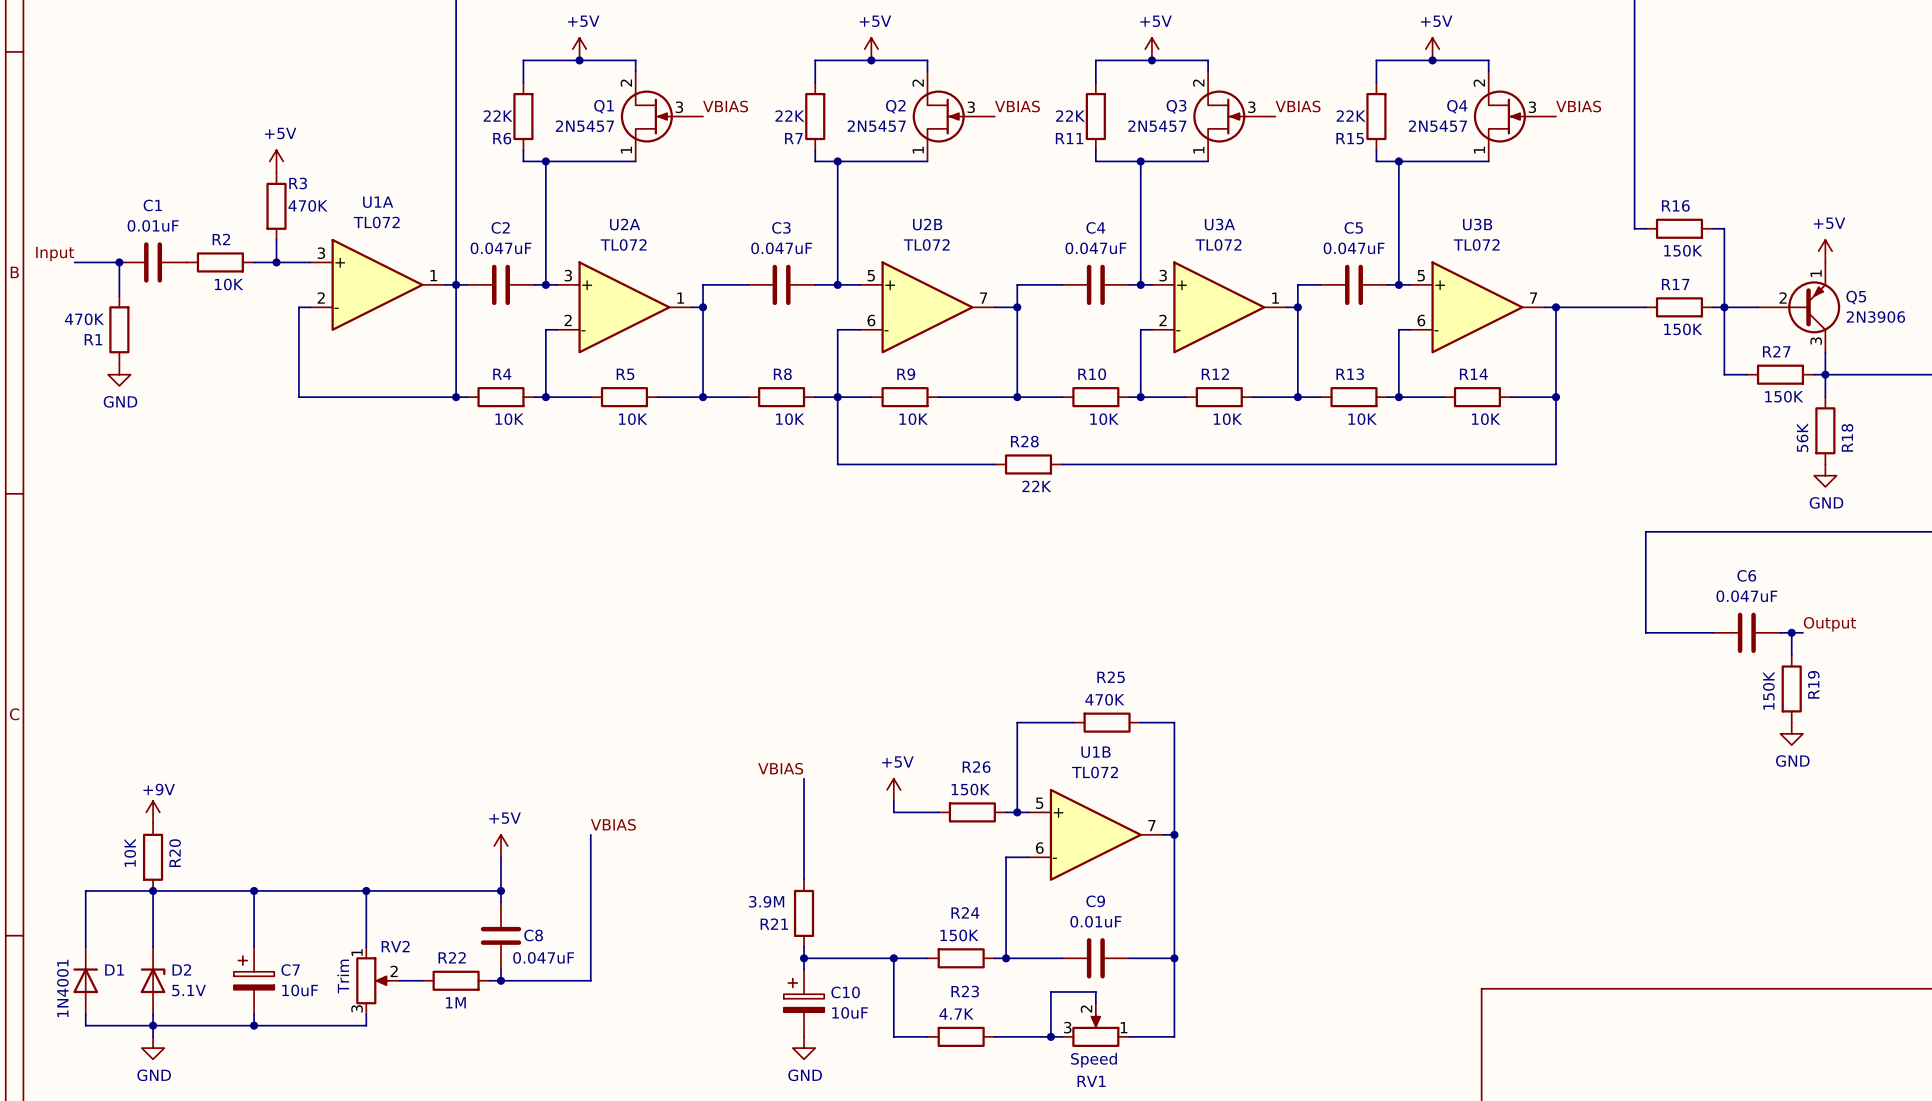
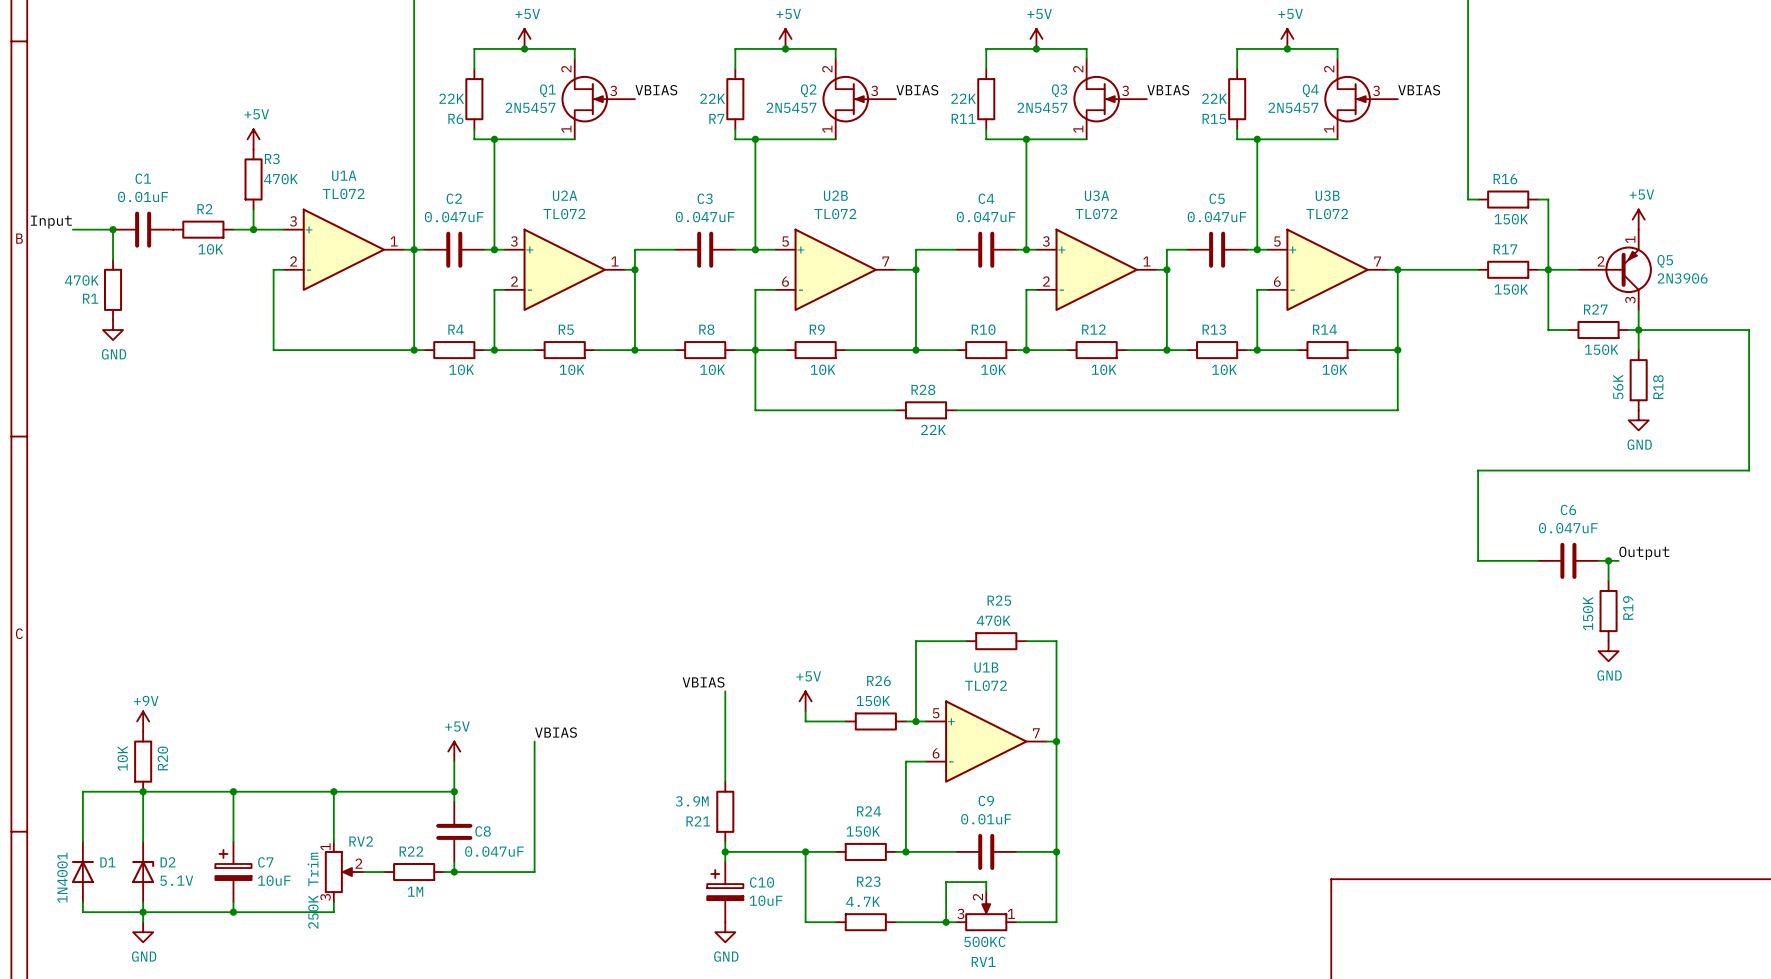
RV2 value: Trim (343, 976) -> 250K Trim (313, 890)
RV1 value: Speed (1093, 1060) -> 500KC (984, 941)

